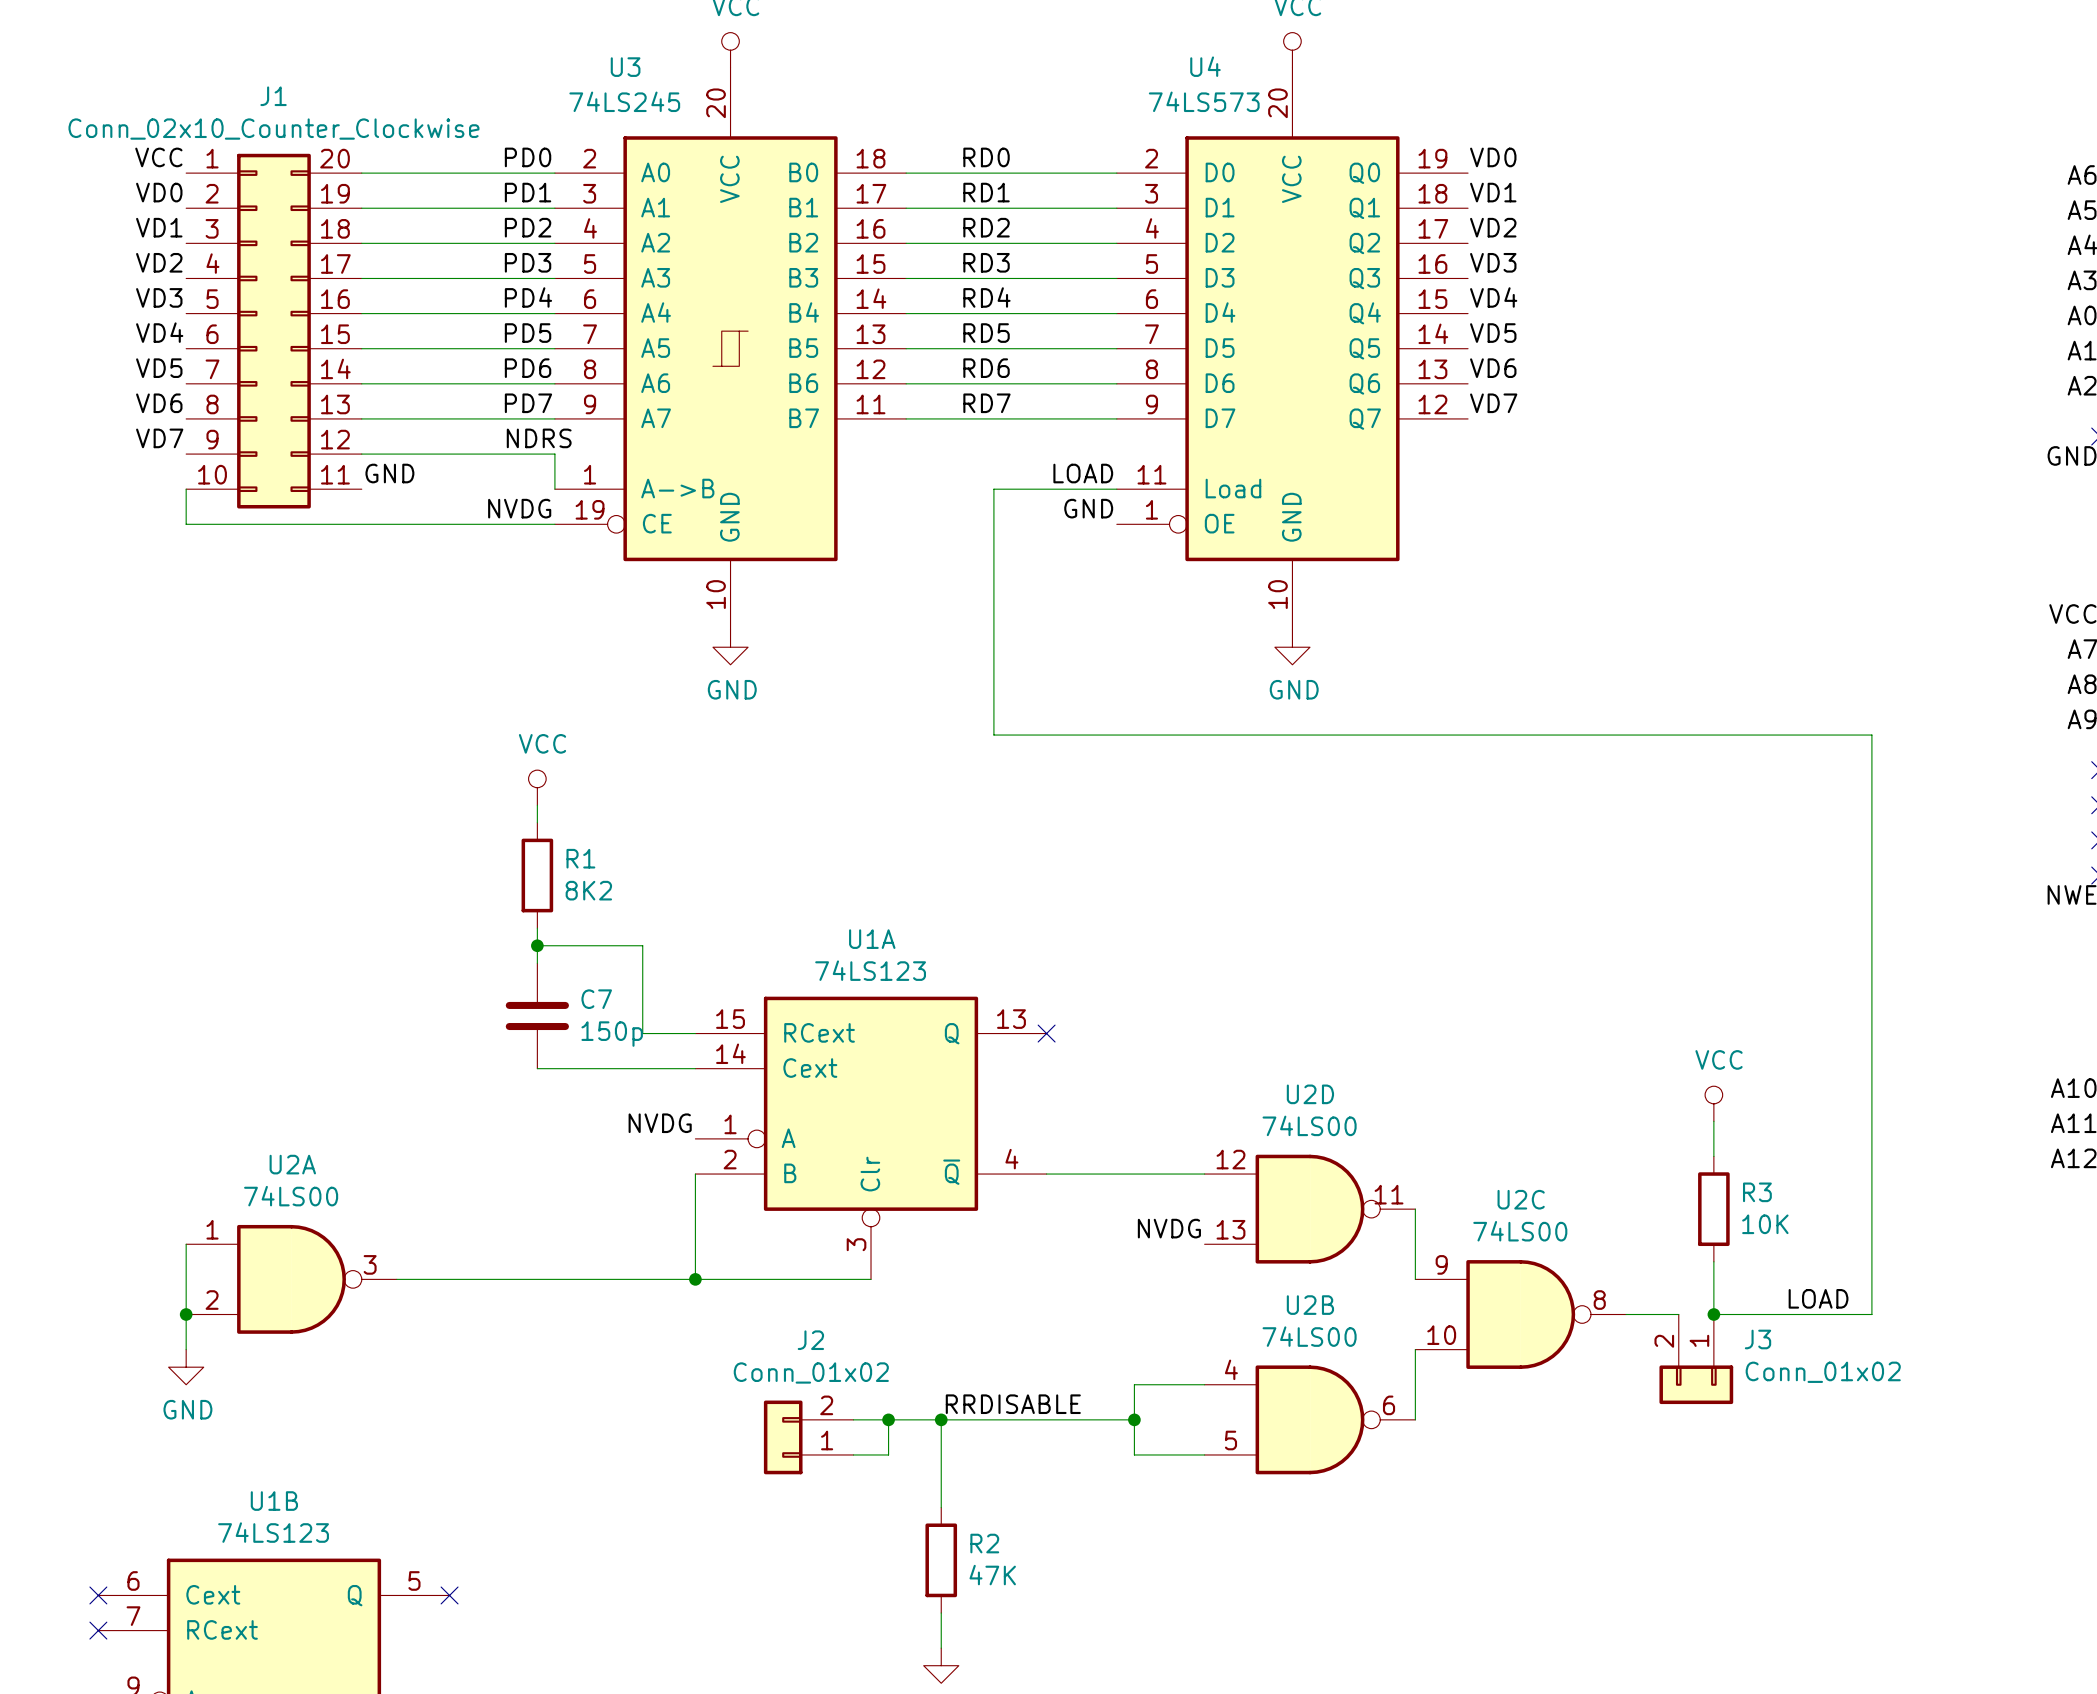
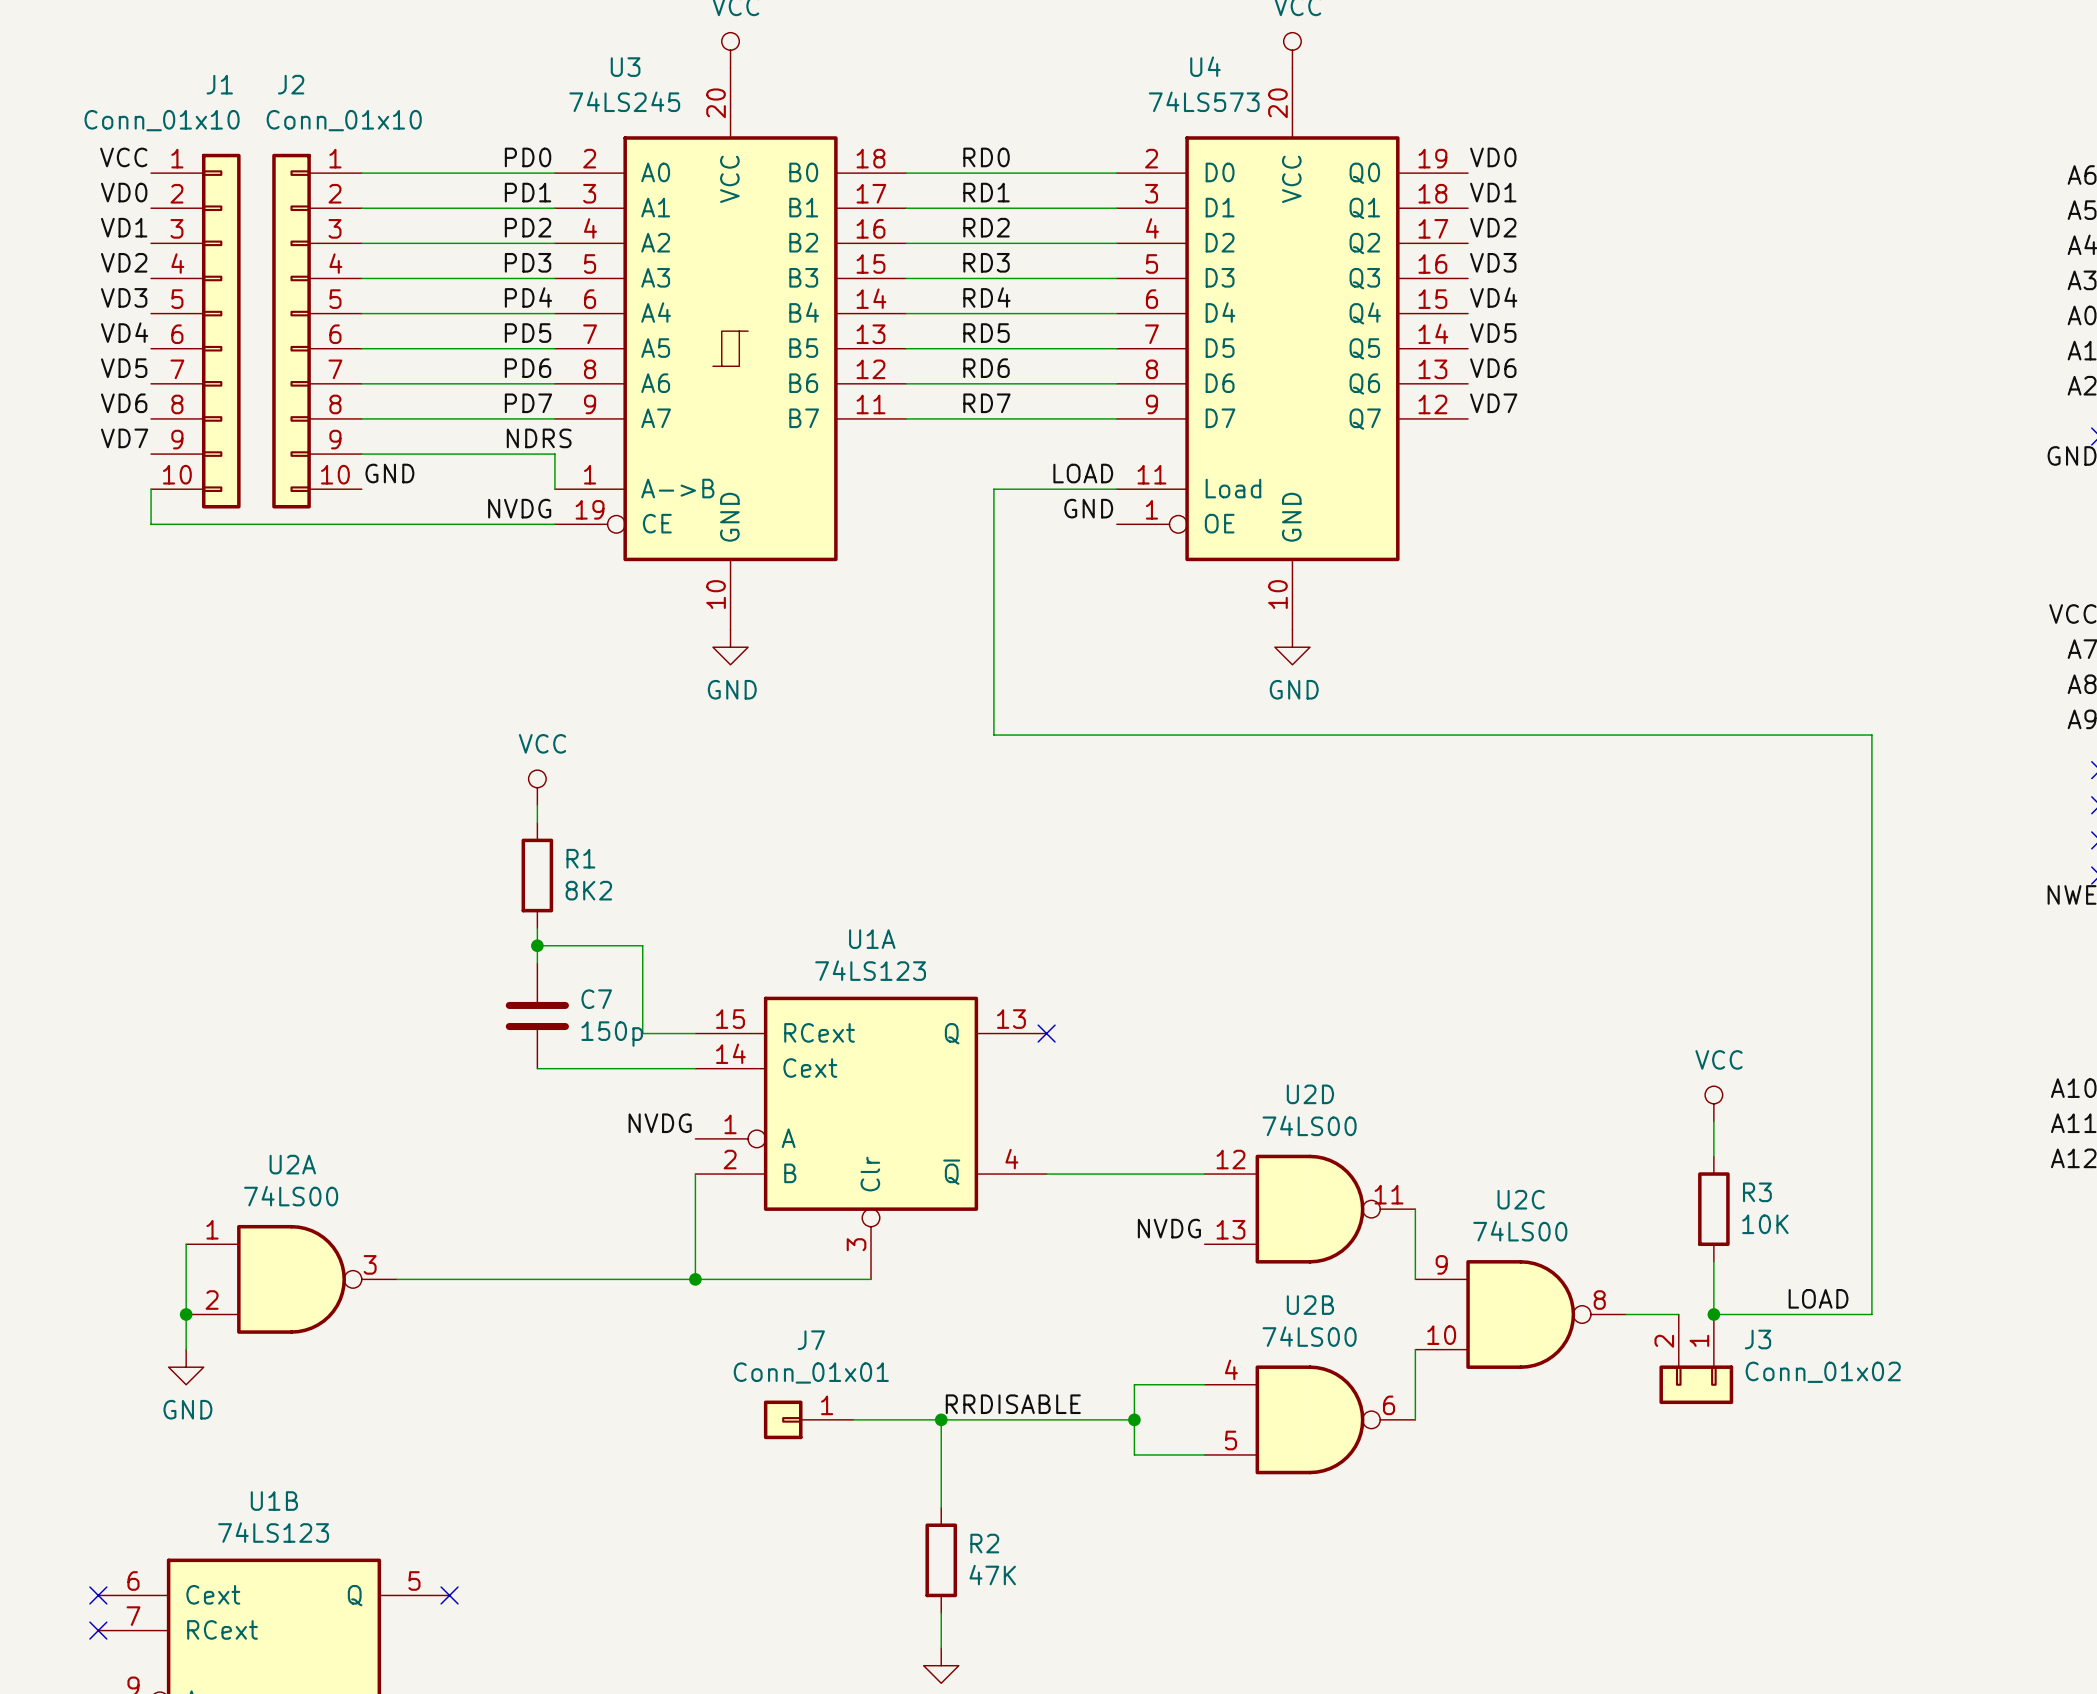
J1 name position: J1 (273, 96) -> J1 (219, 84)
J1 value: Conn_02x10_Counter_Clockwise (273, 129) -> Conn_01x10 (162, 120)
J1 symbol: [186, 153, 362, 509] -> [151, 153, 241, 509]
label position: VCC (158, 157) -> VCC (123, 157)
label position: VD0 (159, 192) -> VD0 (124, 192)
label position: VD1 (159, 227) -> VD1 (124, 227)
label position: VD2 (159, 262) -> VD2 (124, 262)
label position: VD3 (159, 297) -> VD3 (124, 297)
label position: VD4 (159, 332) -> VD4 (124, 332)
label position: VD5 (159, 368) -> VD5 (124, 368)
label position: VD6 (159, 403) -> VD6 (124, 403)
label position: VD7 (159, 438) -> VD7 (124, 438)
wire: (186, 489) (186, 524) -> (151, 489) (151, 524) (186, 524)
J2 name position: J2 (810, 1340) -> J2 (291, 84)
J2 value: Conn_01x02 (811, 1372) -> Conn_01x10 (344, 120)
J2 symbol: [763, 1400, 854, 1475] -> [272, 153, 362, 509]
J7: none -> Conn_01x01 (808, 1419)
wire: (888, 1419) (888, 1454) (853, 1454) -> none
junction: (888, 1419) -> none

